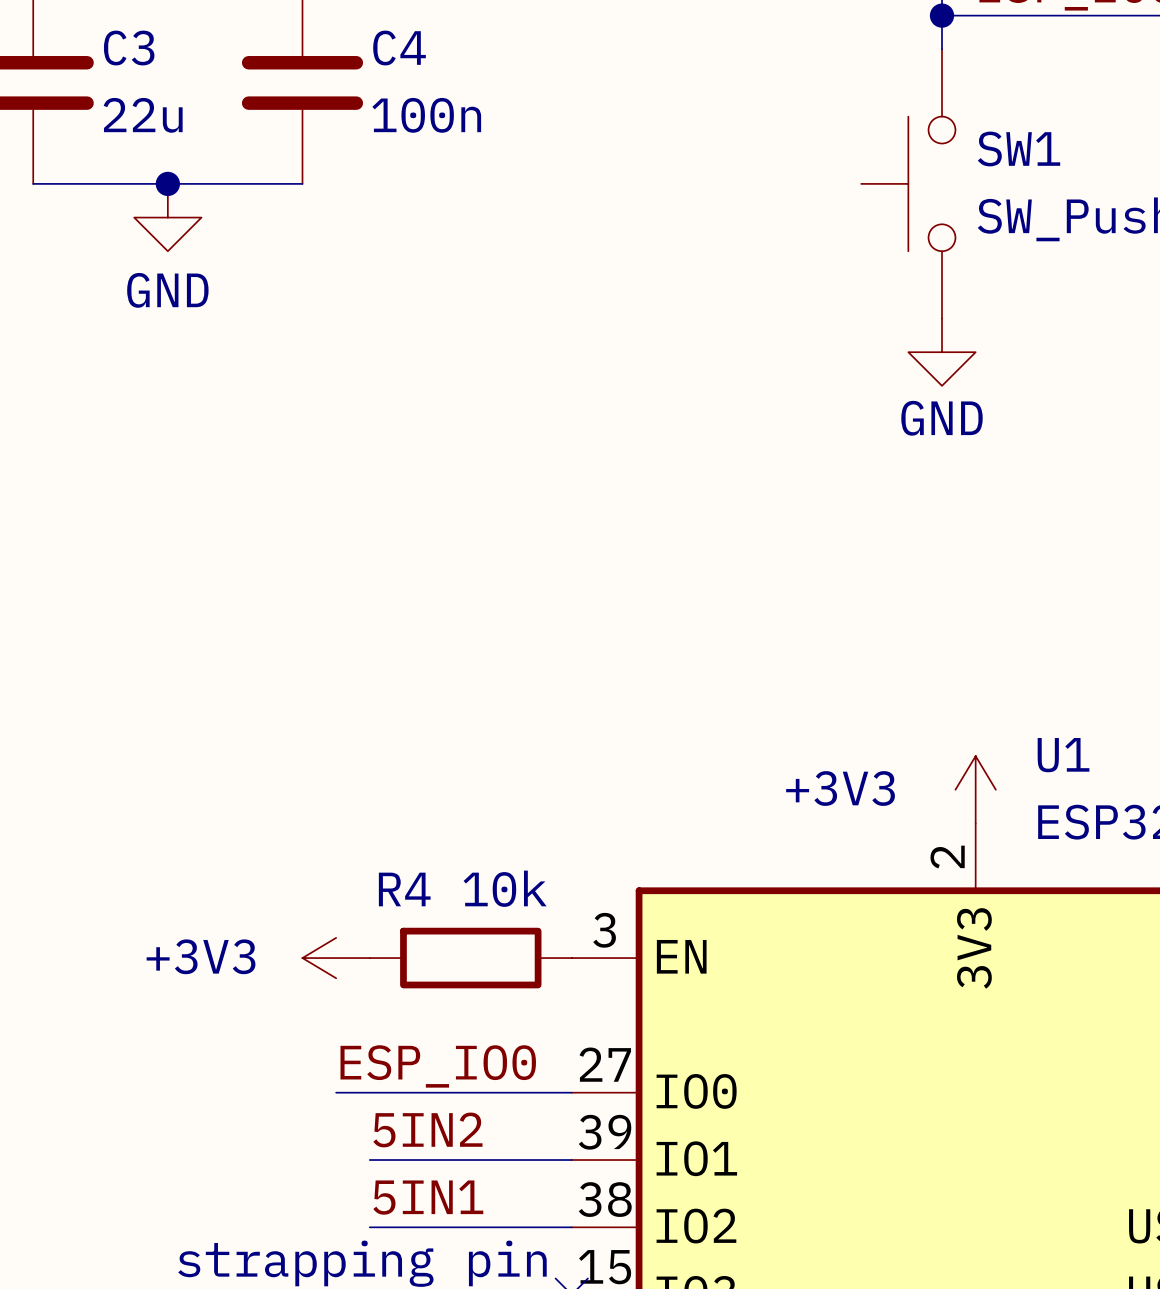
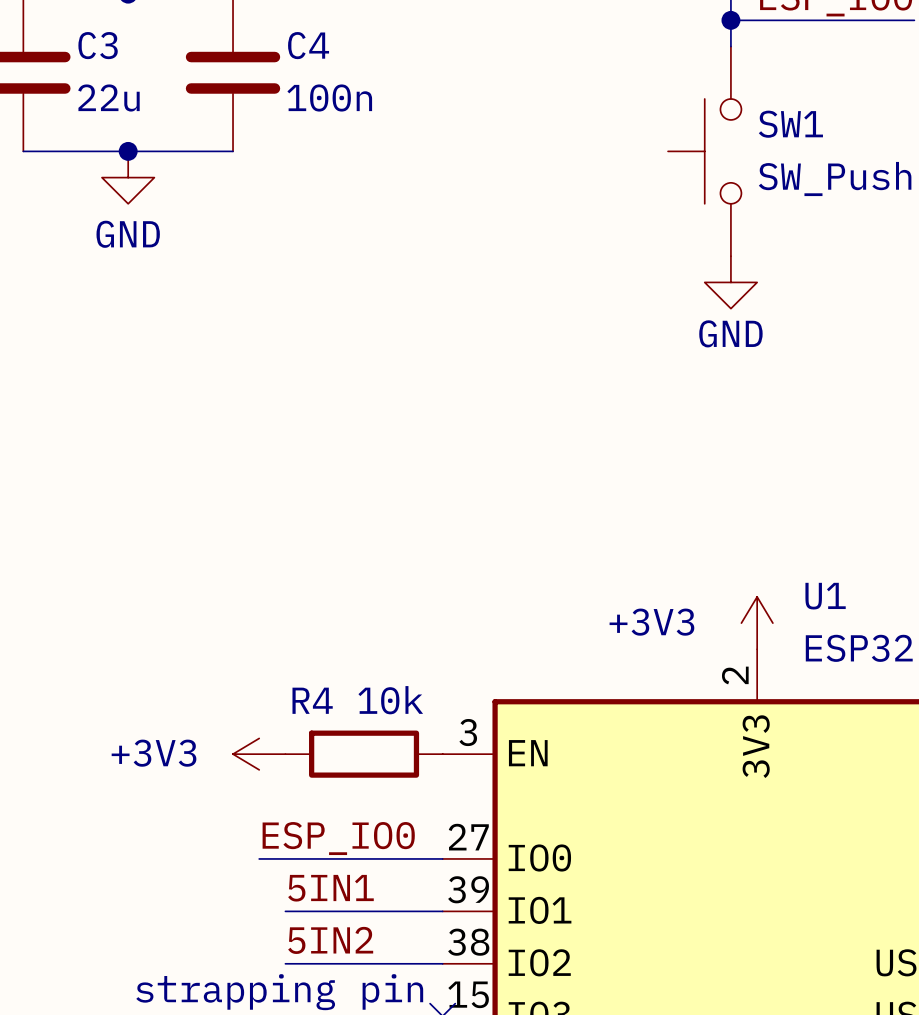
label: 5IN2 (427, 1129) -> 5IN1 (330, 888)
label: 5IN1 (428, 1197) -> 5IN2 (330, 940)

